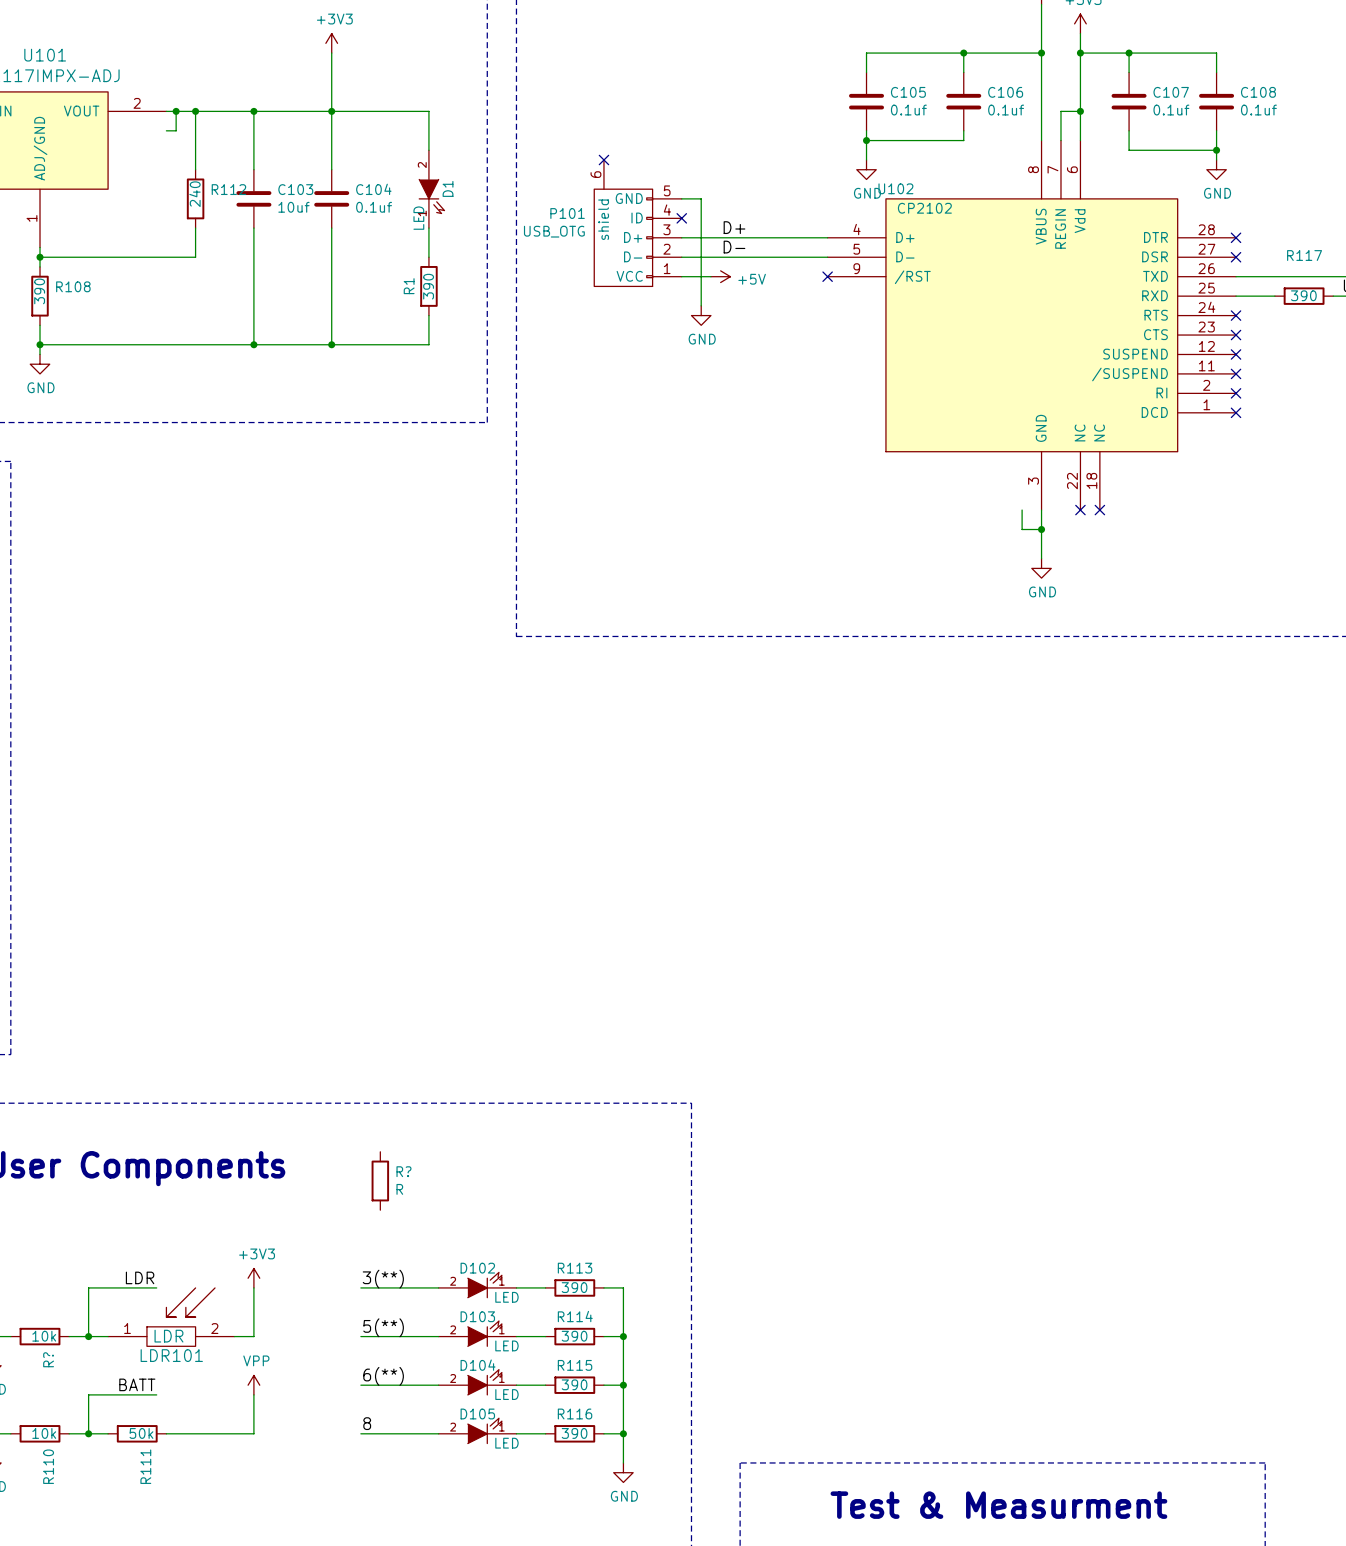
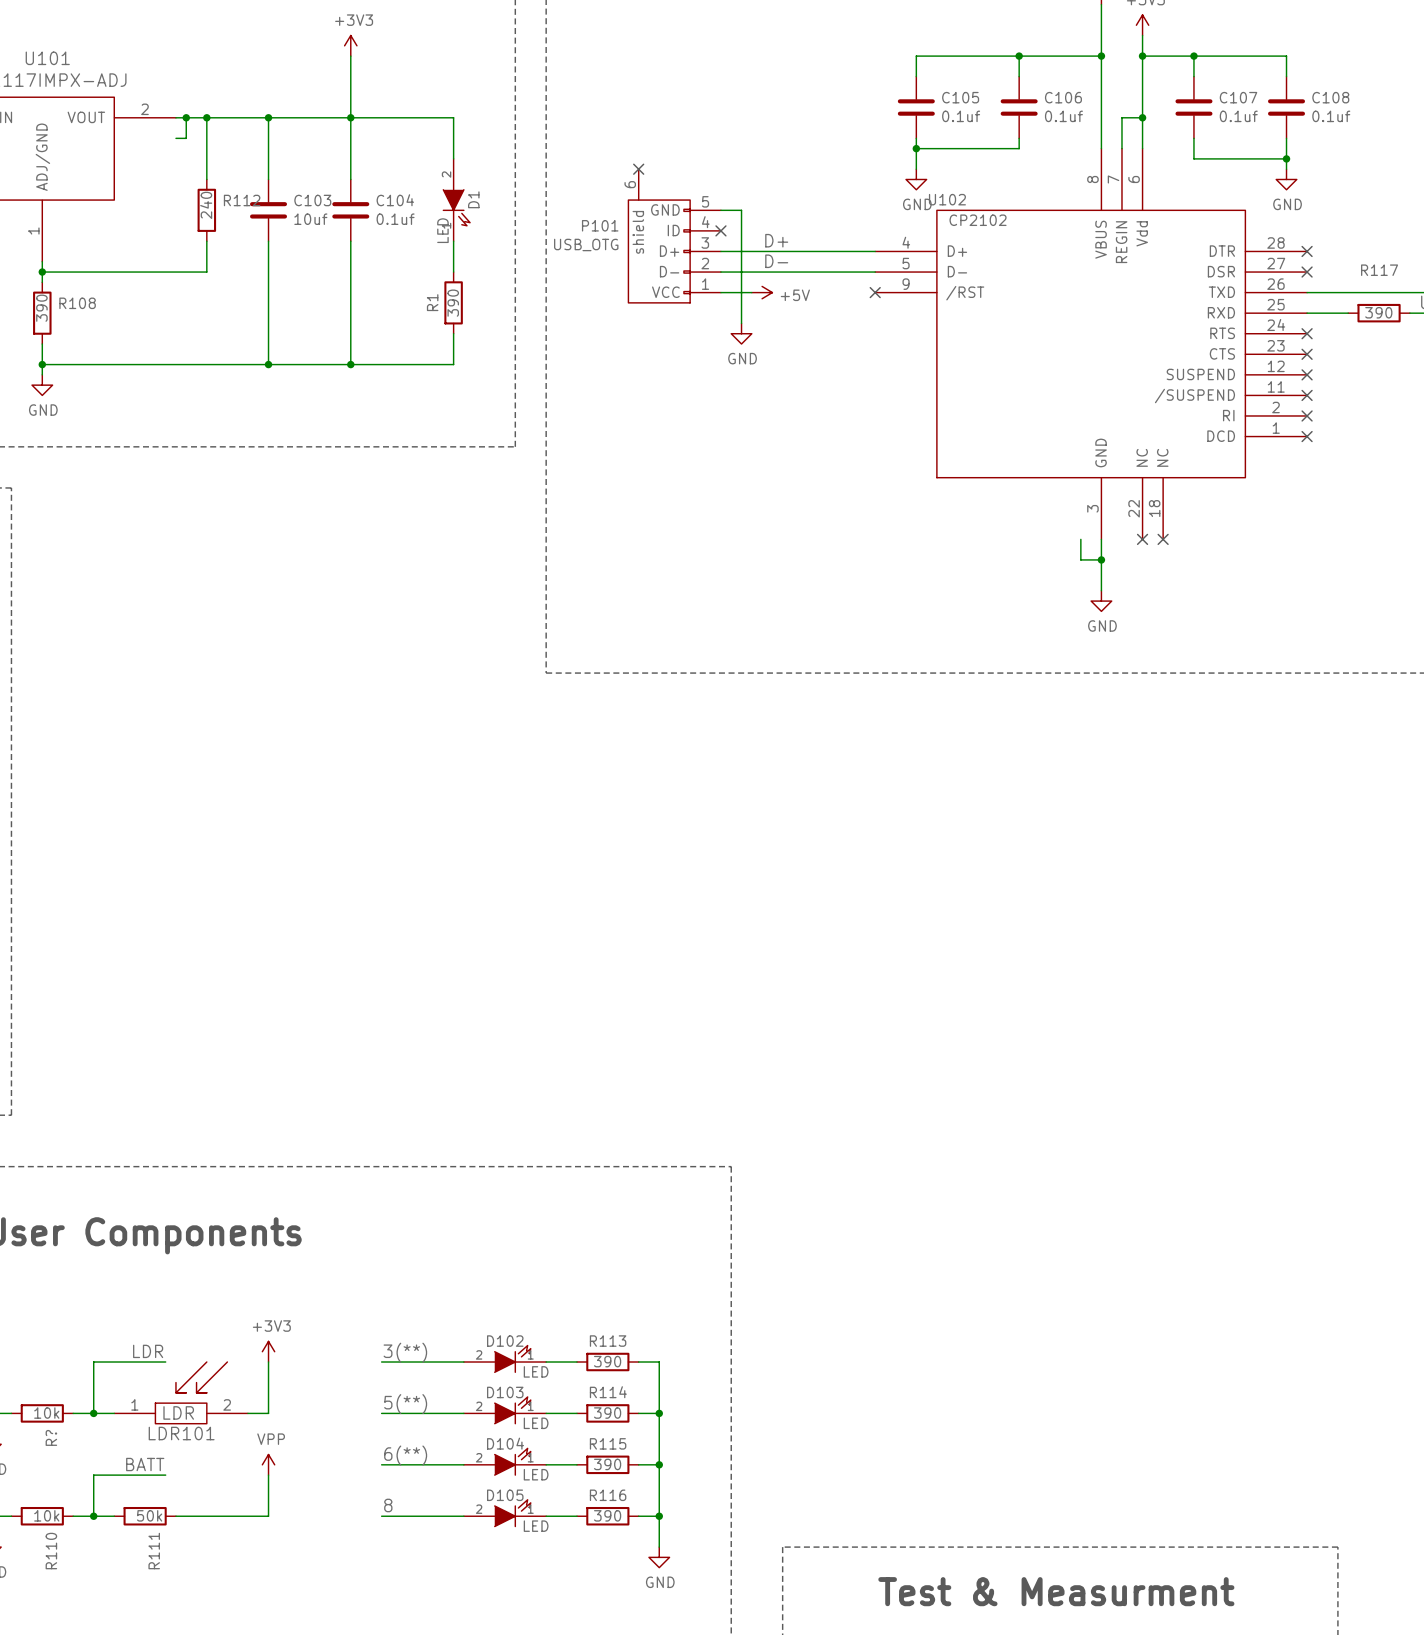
R?: R (380, 1180) -> none

